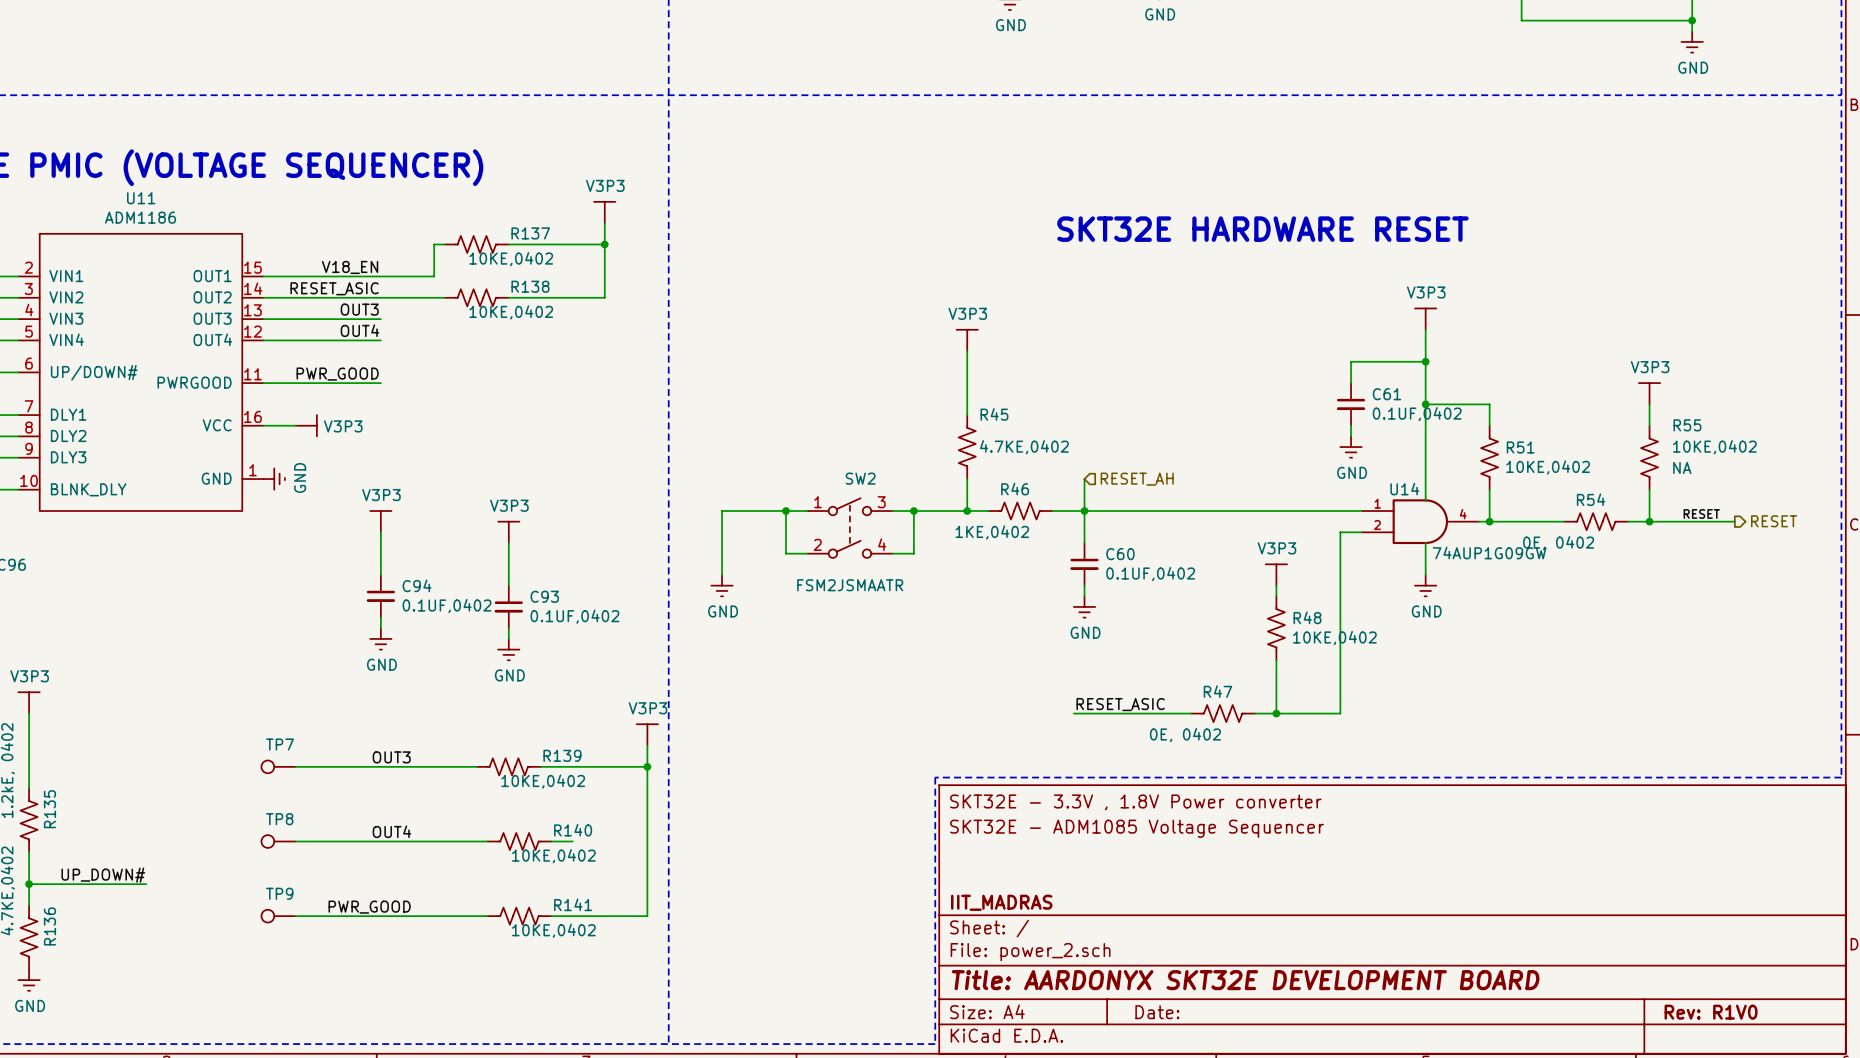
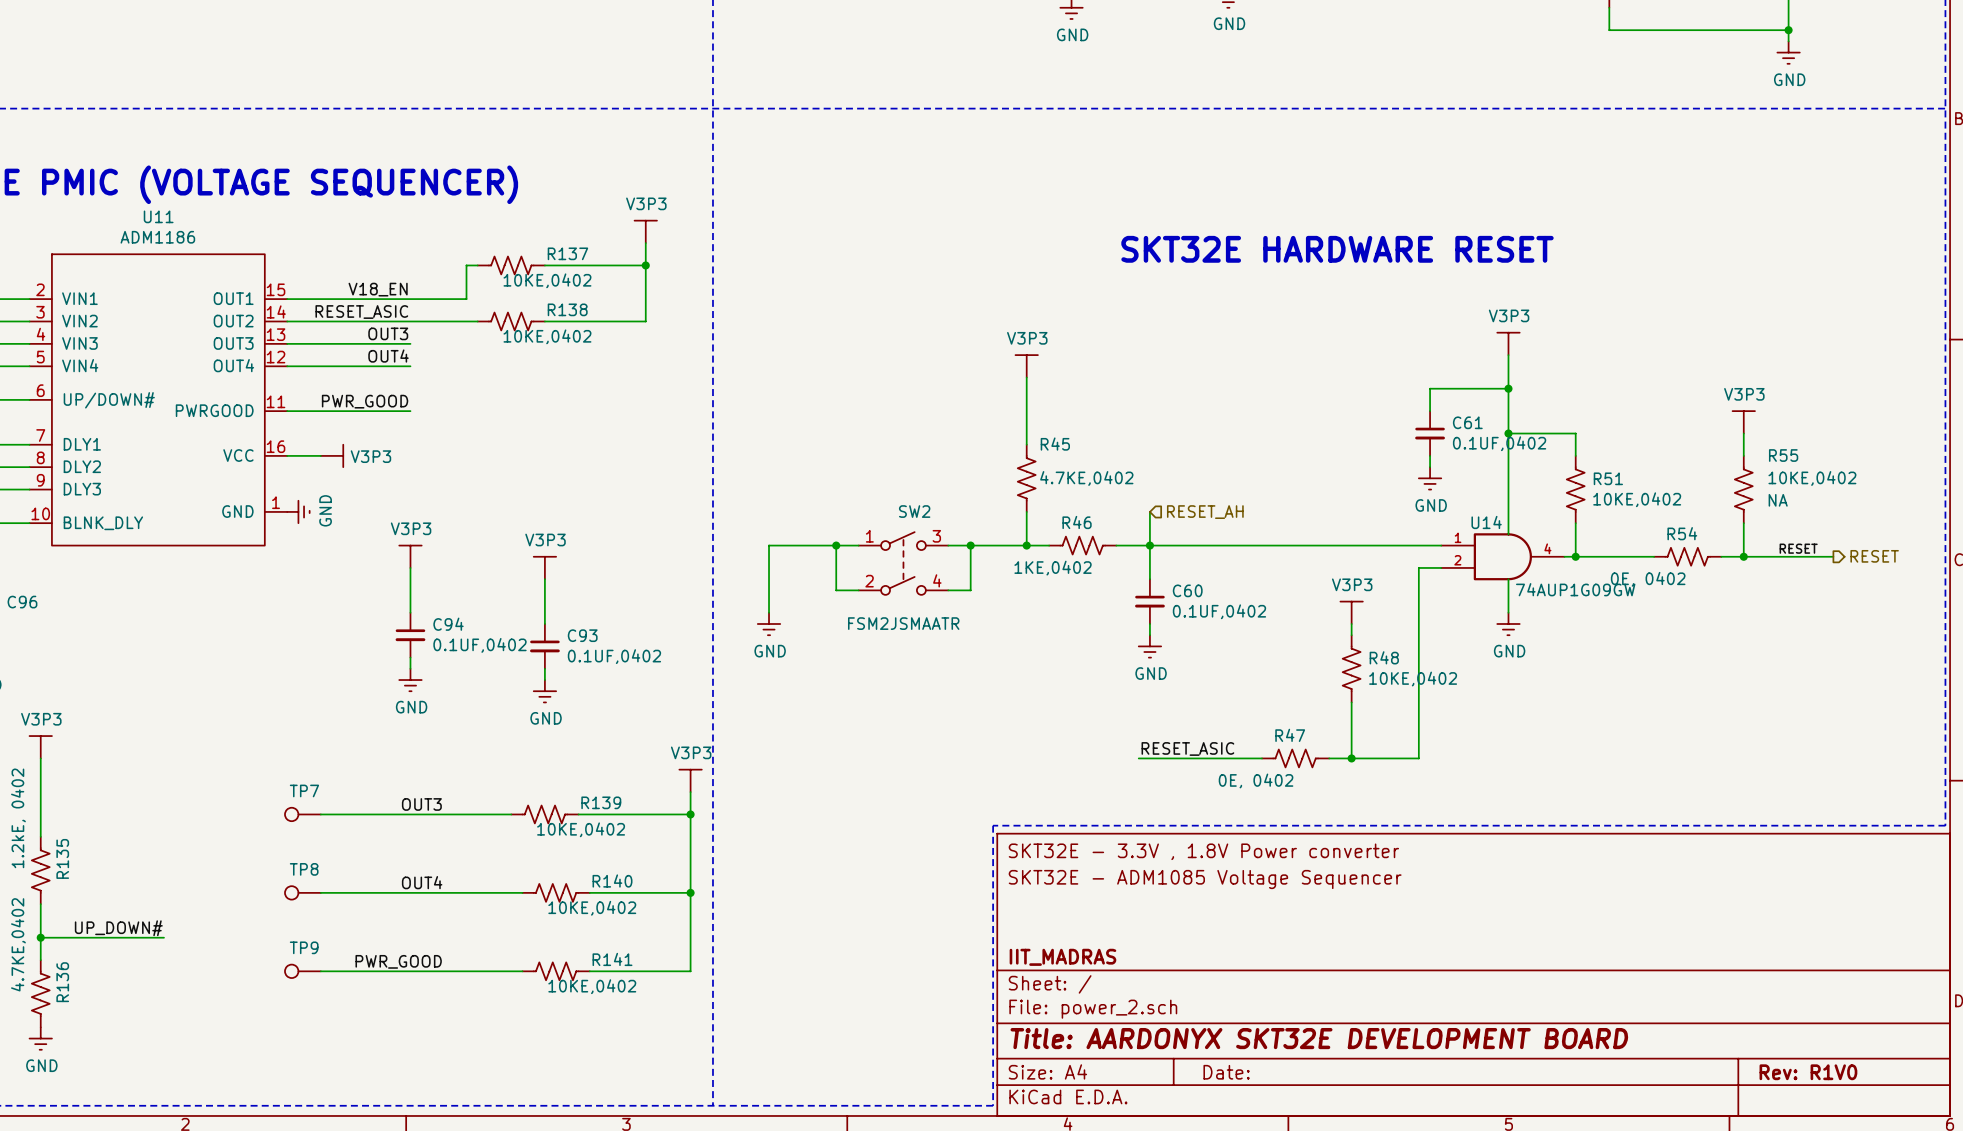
wire: none -> (612, 892) (690, 892)
junction: none -> (690, 892)

